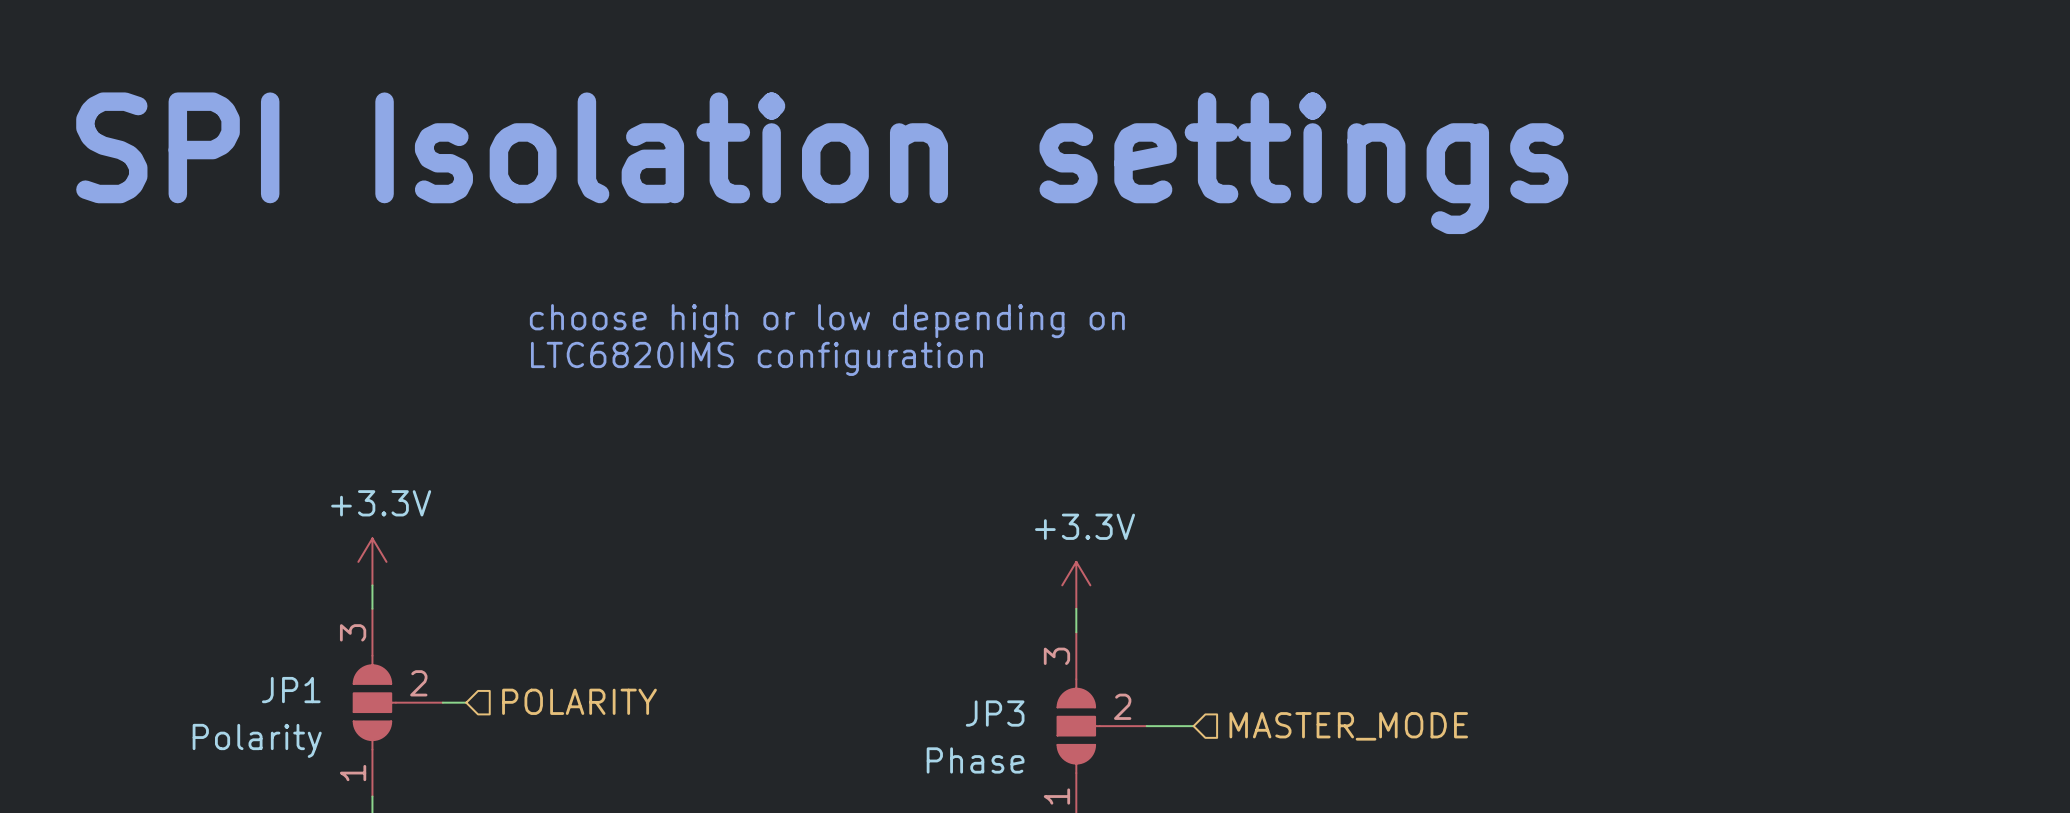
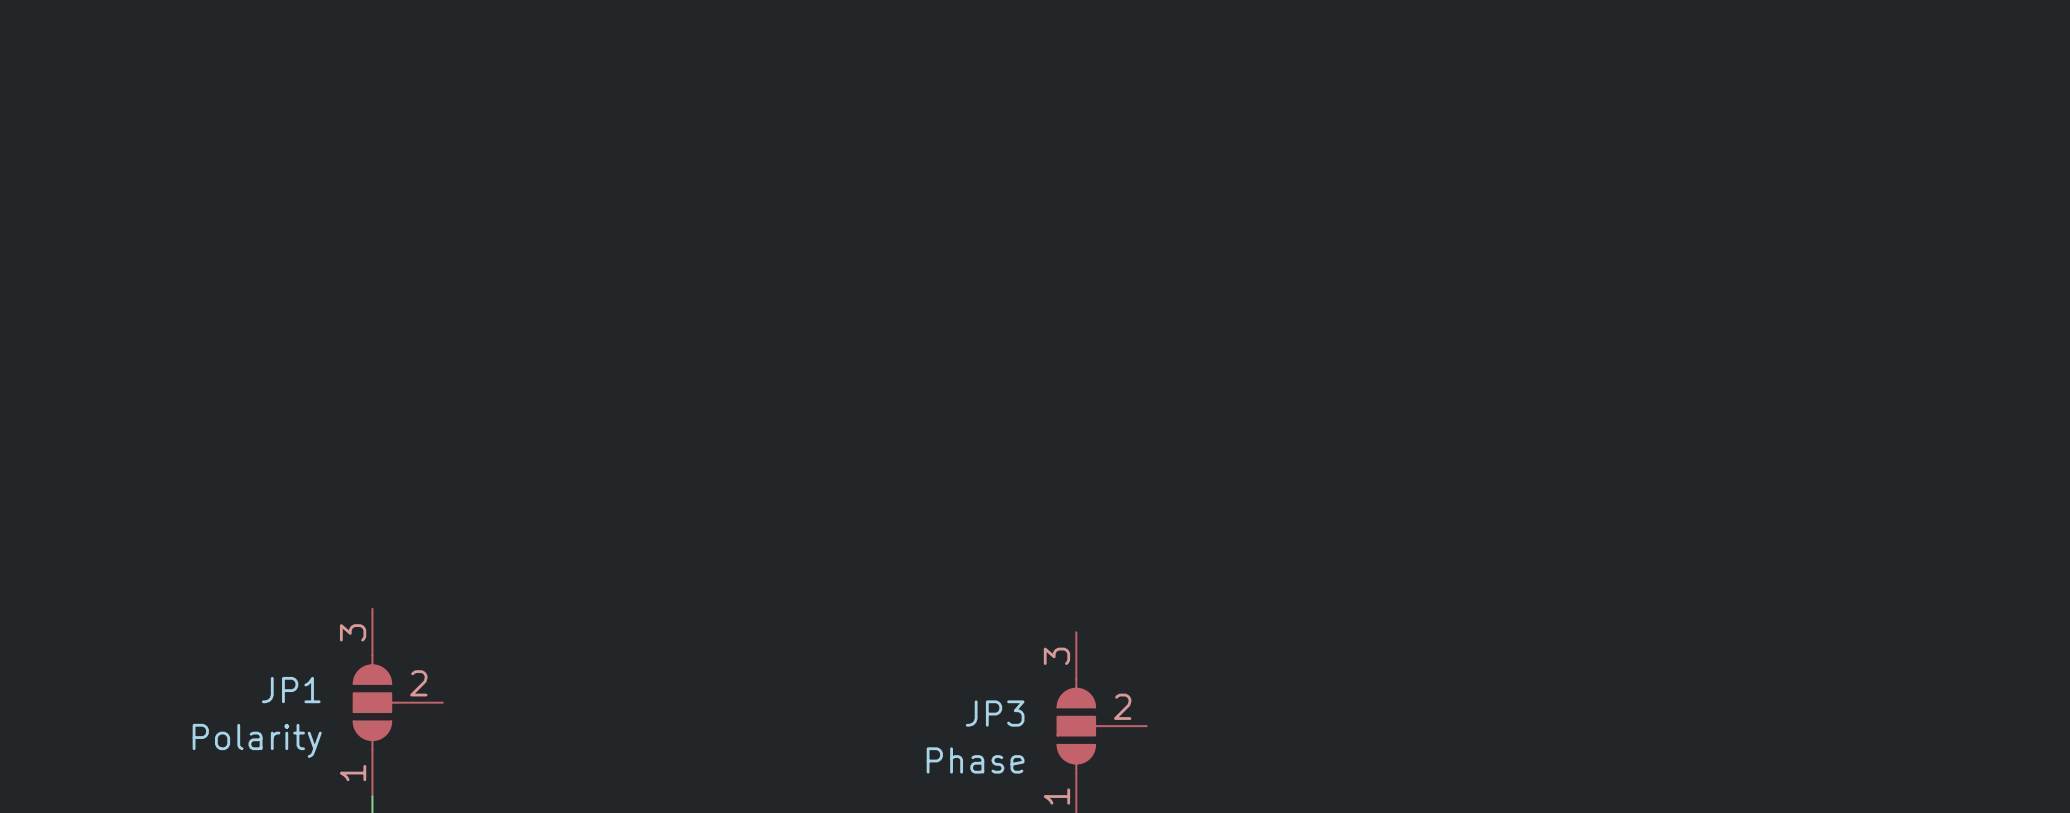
text: SPI Isolation settings (822, 163) -> none
text: choose high or low depending on (827, 321) -> none
text: LTC6820IMS configuration (756, 358) -> none
power symbol: +3.3V (372, 561) -> none
wire: (372, 585) (372, 608) -> none
power symbol: +3.3V (1076, 585) -> none
wire: (1076, 608) (1076, 632) -> none
hierarchical label: POLARITY (579, 701) -> none
wire: (442, 702) (466, 702) -> none
wire: (1146, 726) (1193, 726) -> none
hierarchical label: MASTER_MODE (1348, 726) -> none

